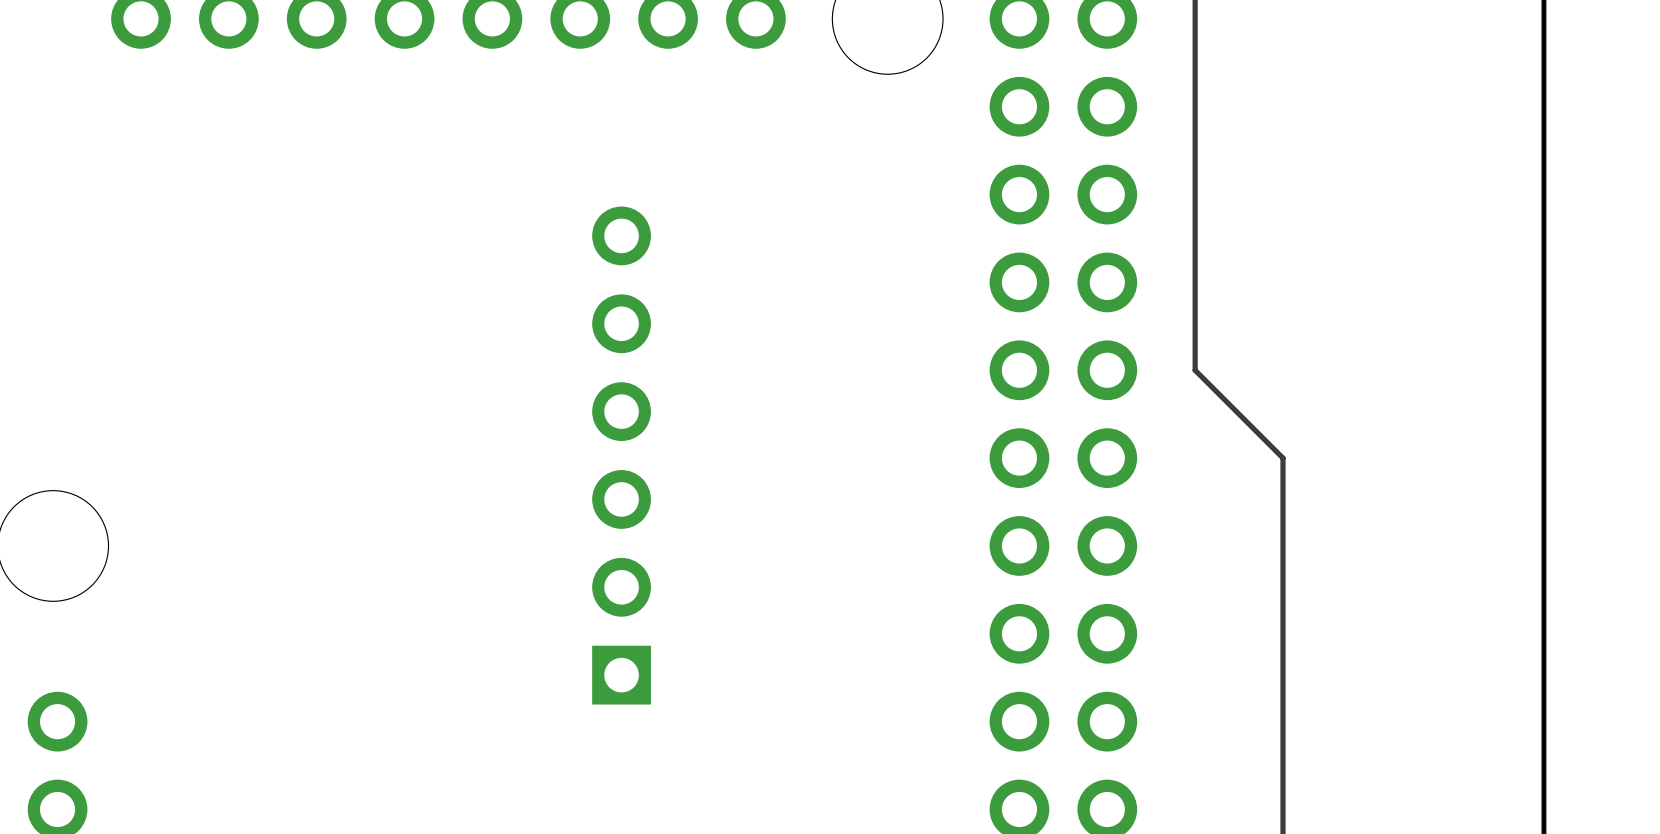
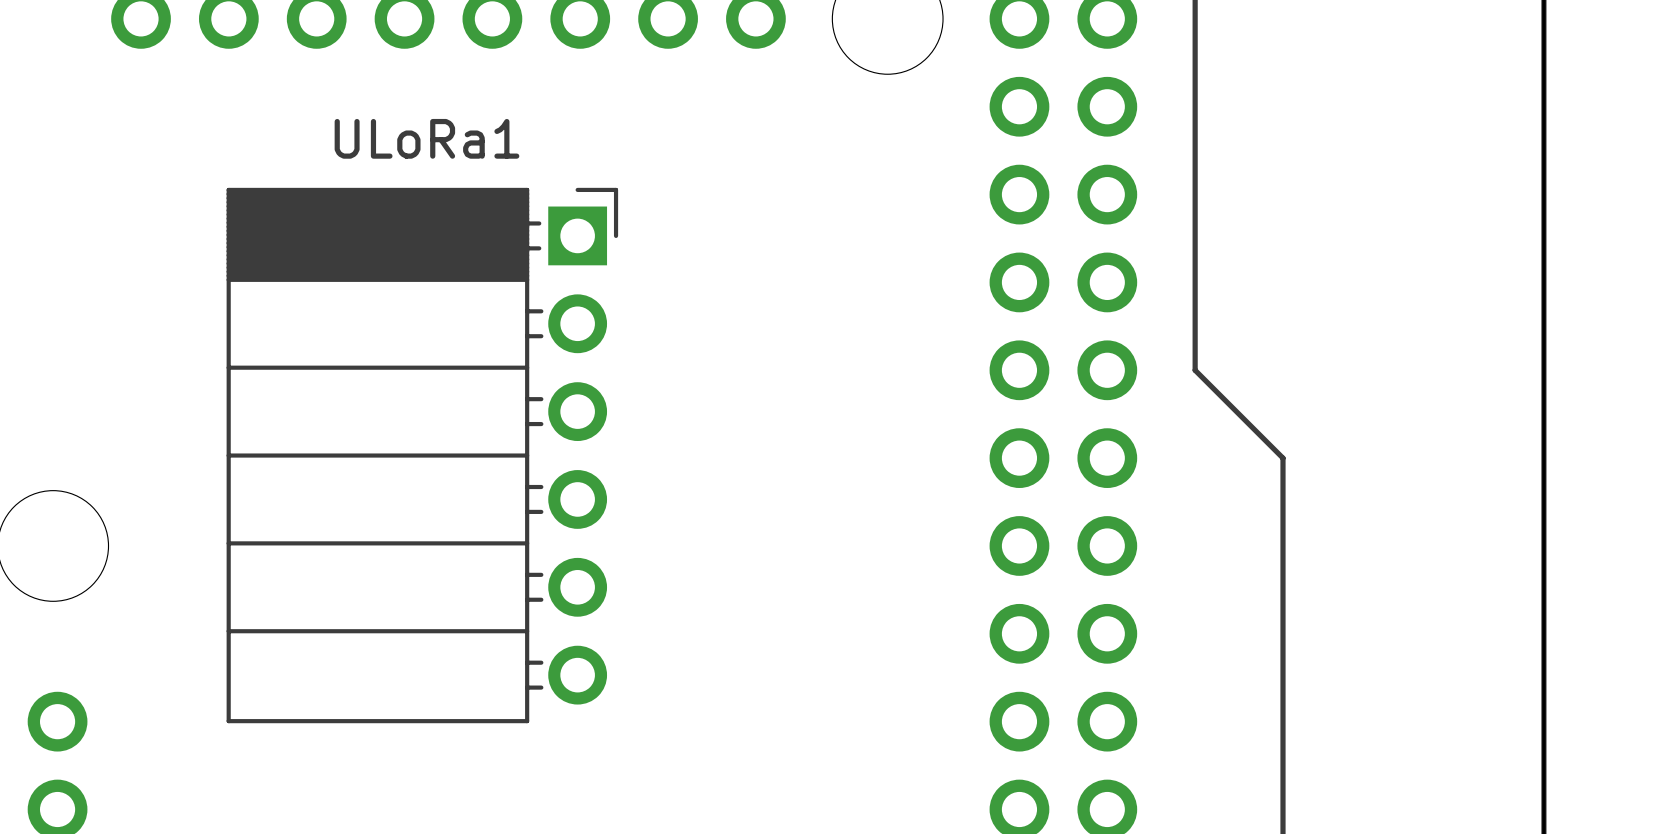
ULoRa1 side: bottom (621, 455) -> top (422, 455)

